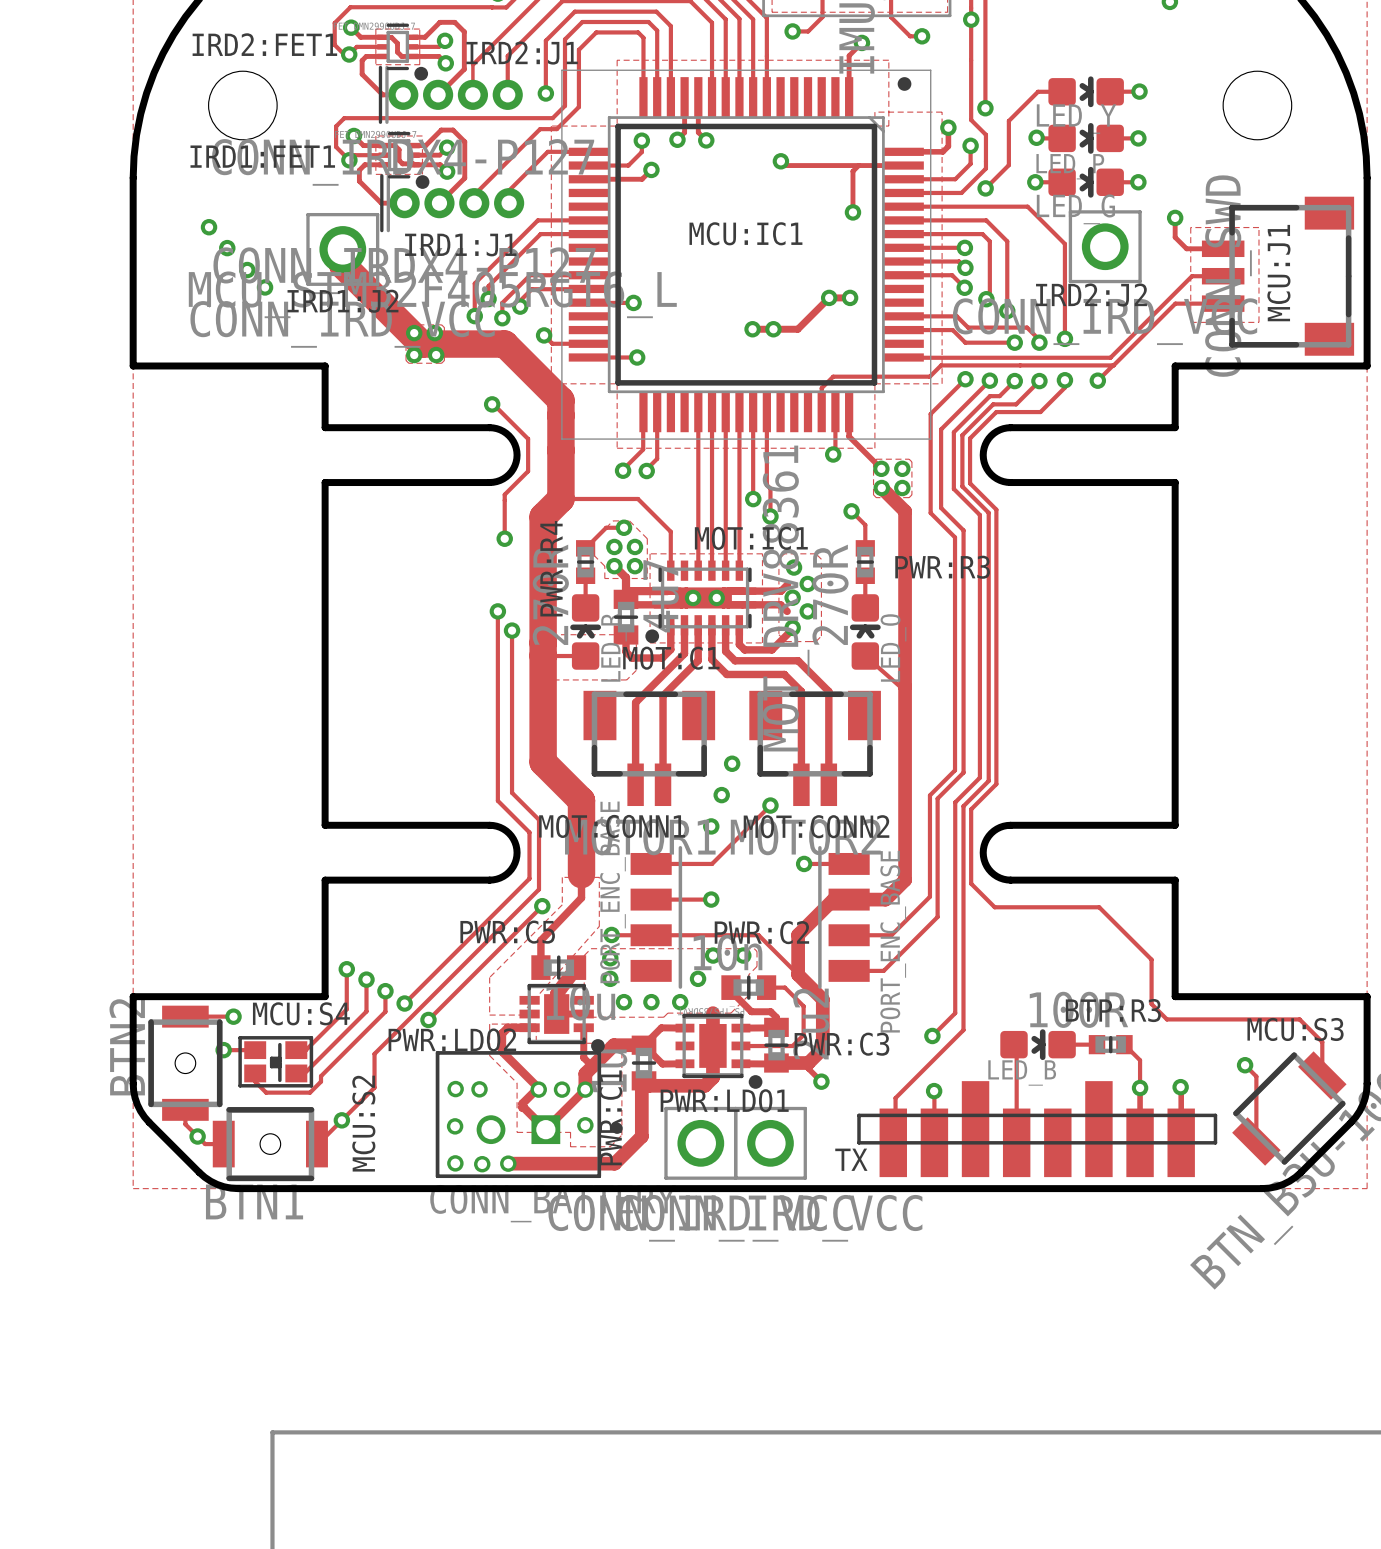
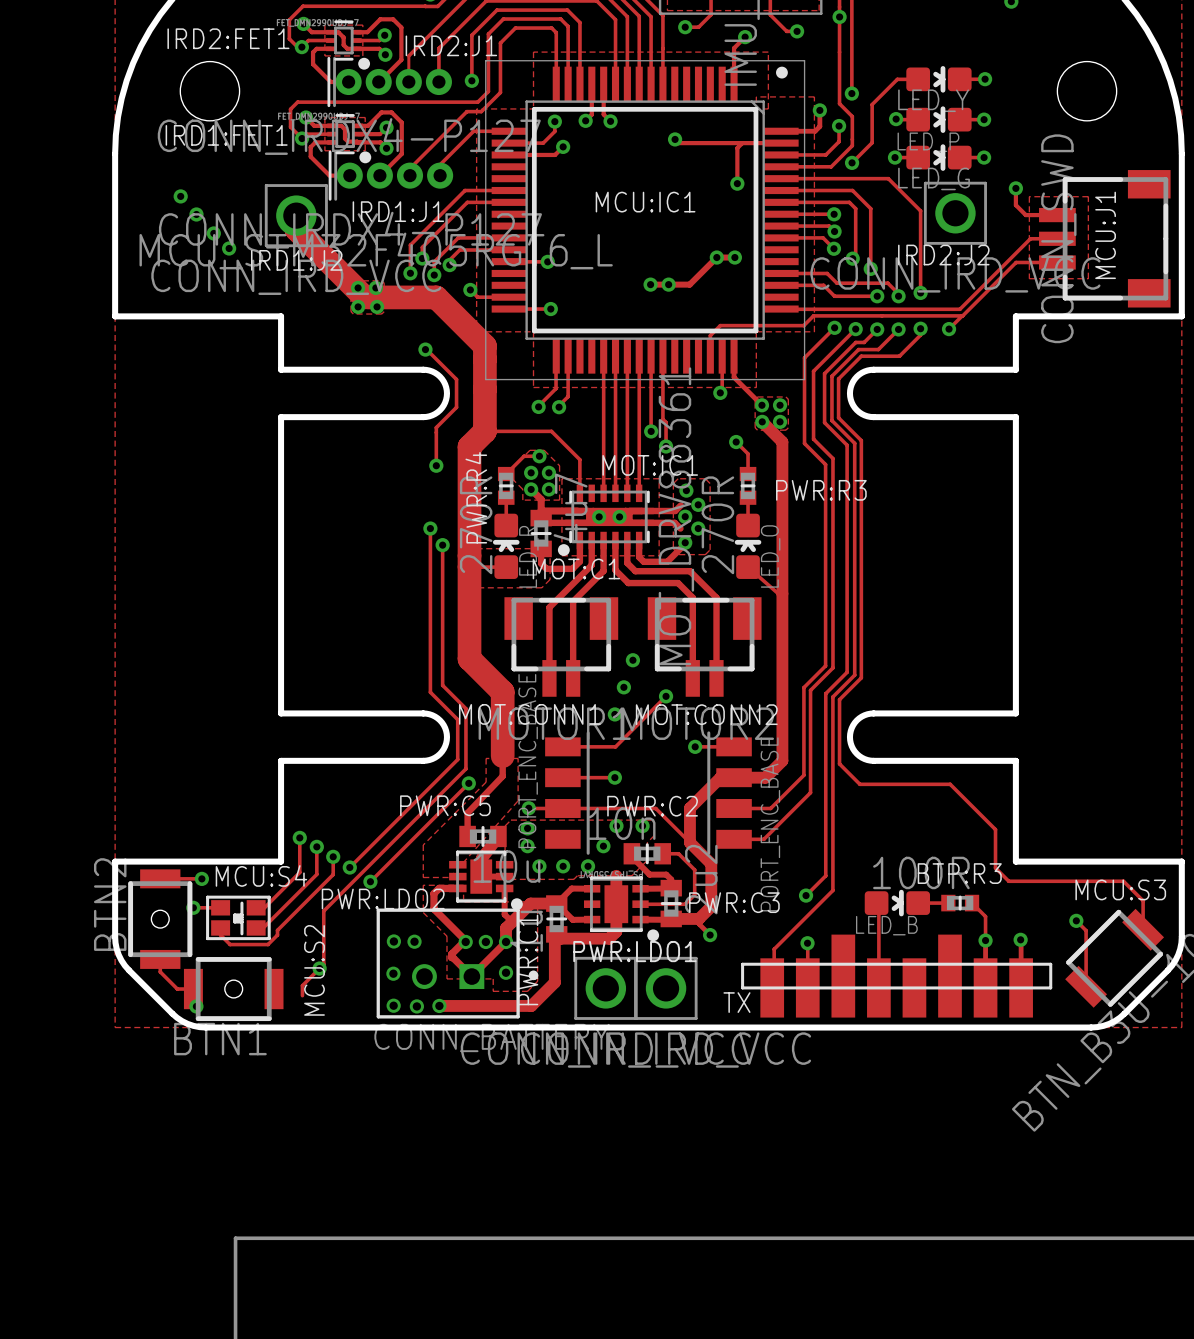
track: (374, 1087) (316, 1144) -> (323, 940) (323, 964) (302, 985) (302, 995)
via position: (341, 1120) -> (319, 968)
via position: (197, 1136) -> (196, 1006)

